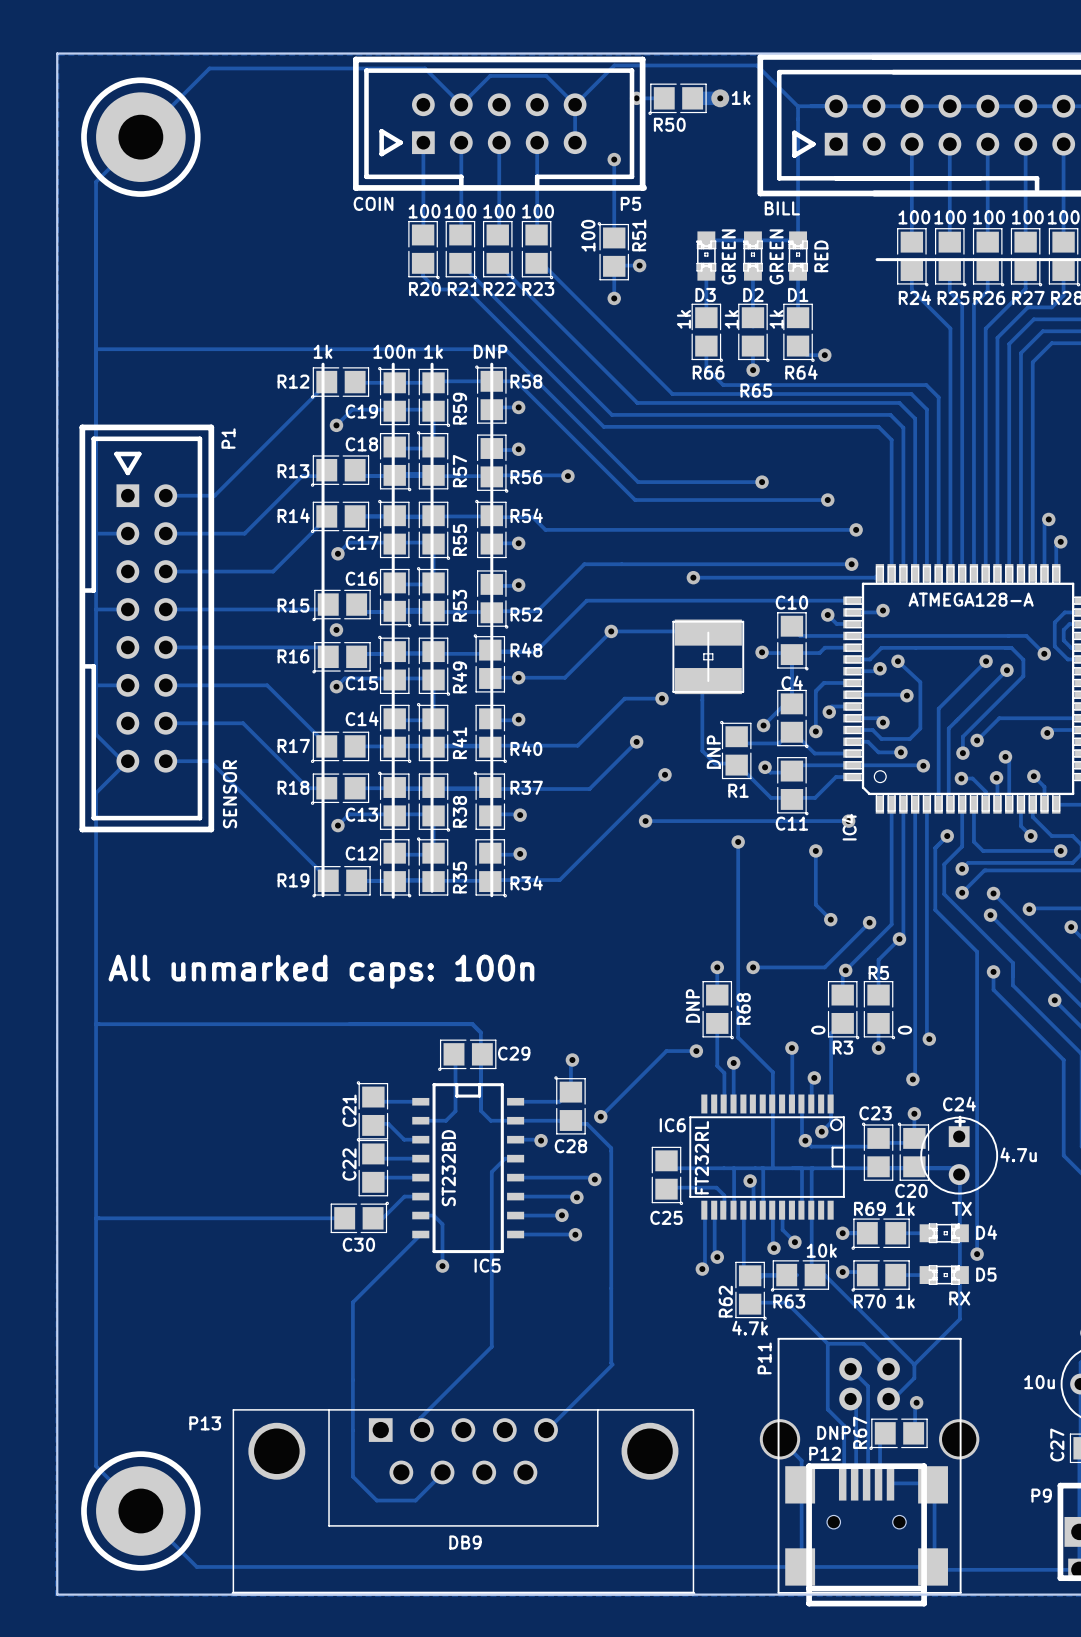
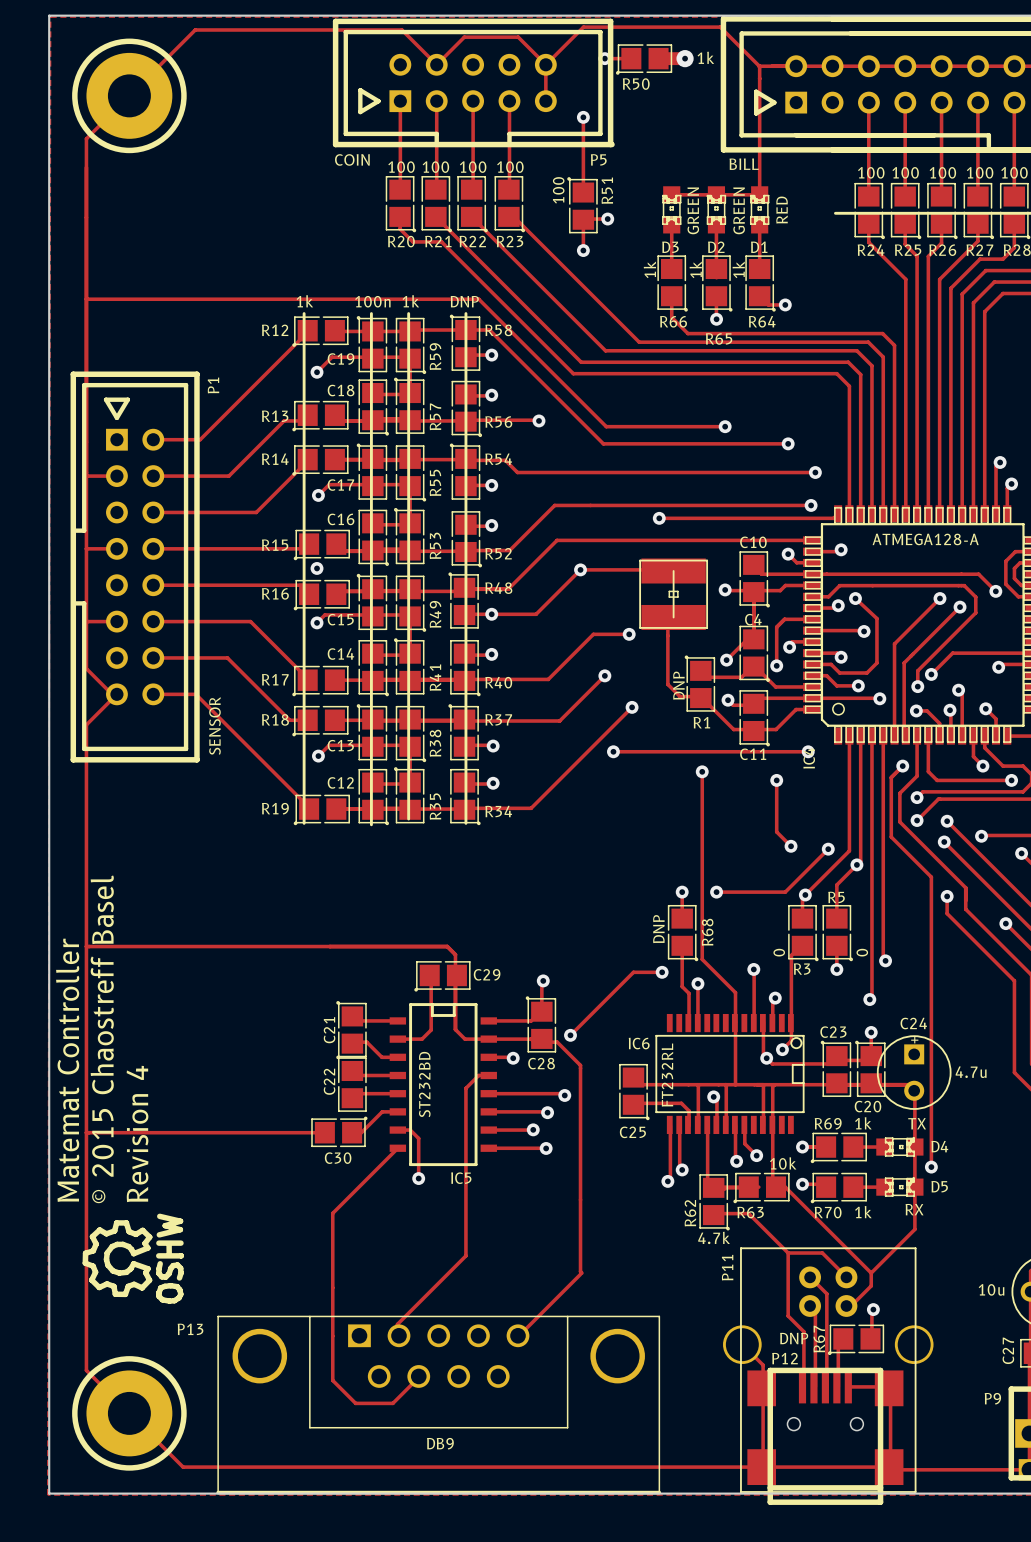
text: All unmarked caps: 100n (321, 971) -> none
text: none -> © 2015 Chaostreff Basel (102, 1039)
text: none -> Matemat Controller (67, 1070)
text: none -> Revision 4 (137, 1133)
drawing: none -> [82, 1213, 184, 1304]

